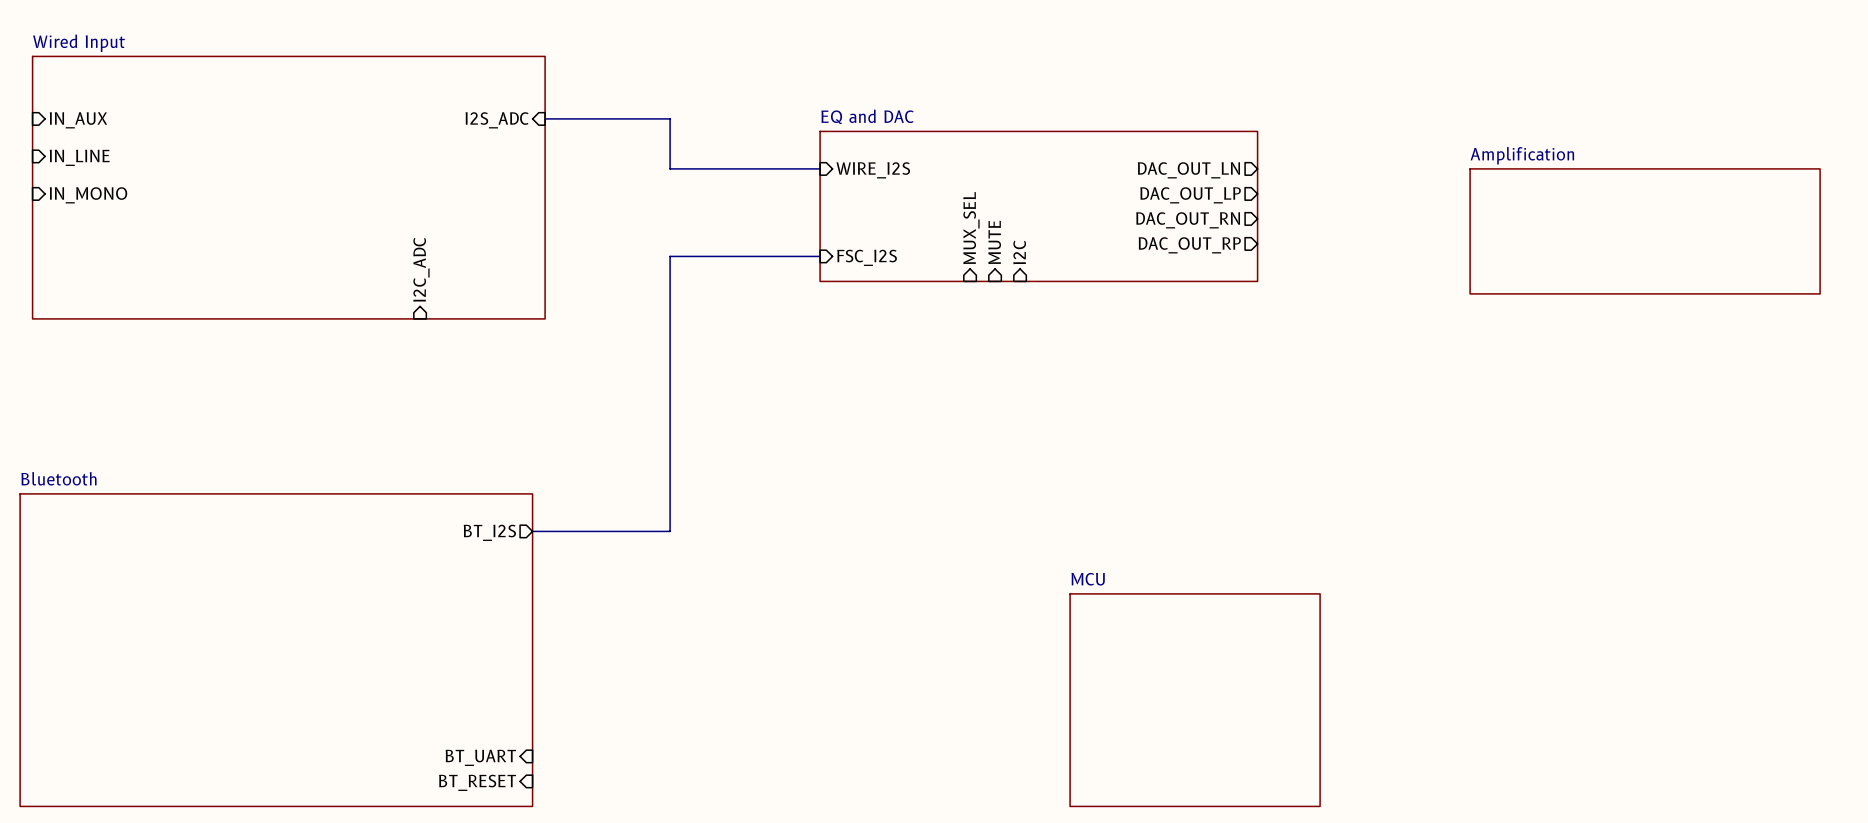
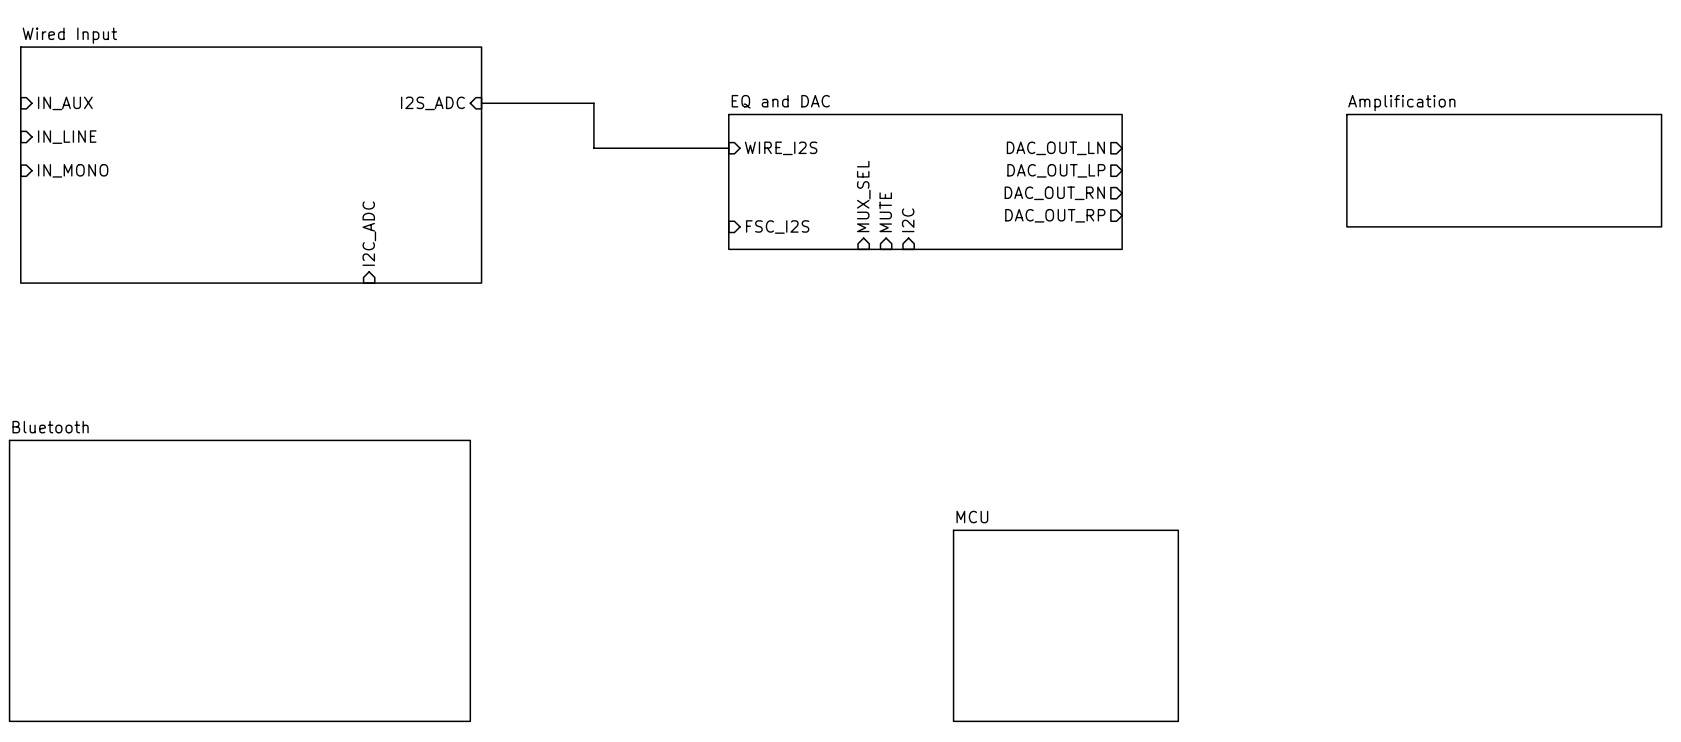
sheet Amplification position: (1645, 231) -> (1504, 170)
wire: (820, 256) (670, 256) (670, 531) (532, 531) -> none
sheet pin: BT_I2S (489, 532) -> none
sheet pin: BT_UART (480, 757) -> none
sheet pin: BT_RESET (477, 782) -> none

